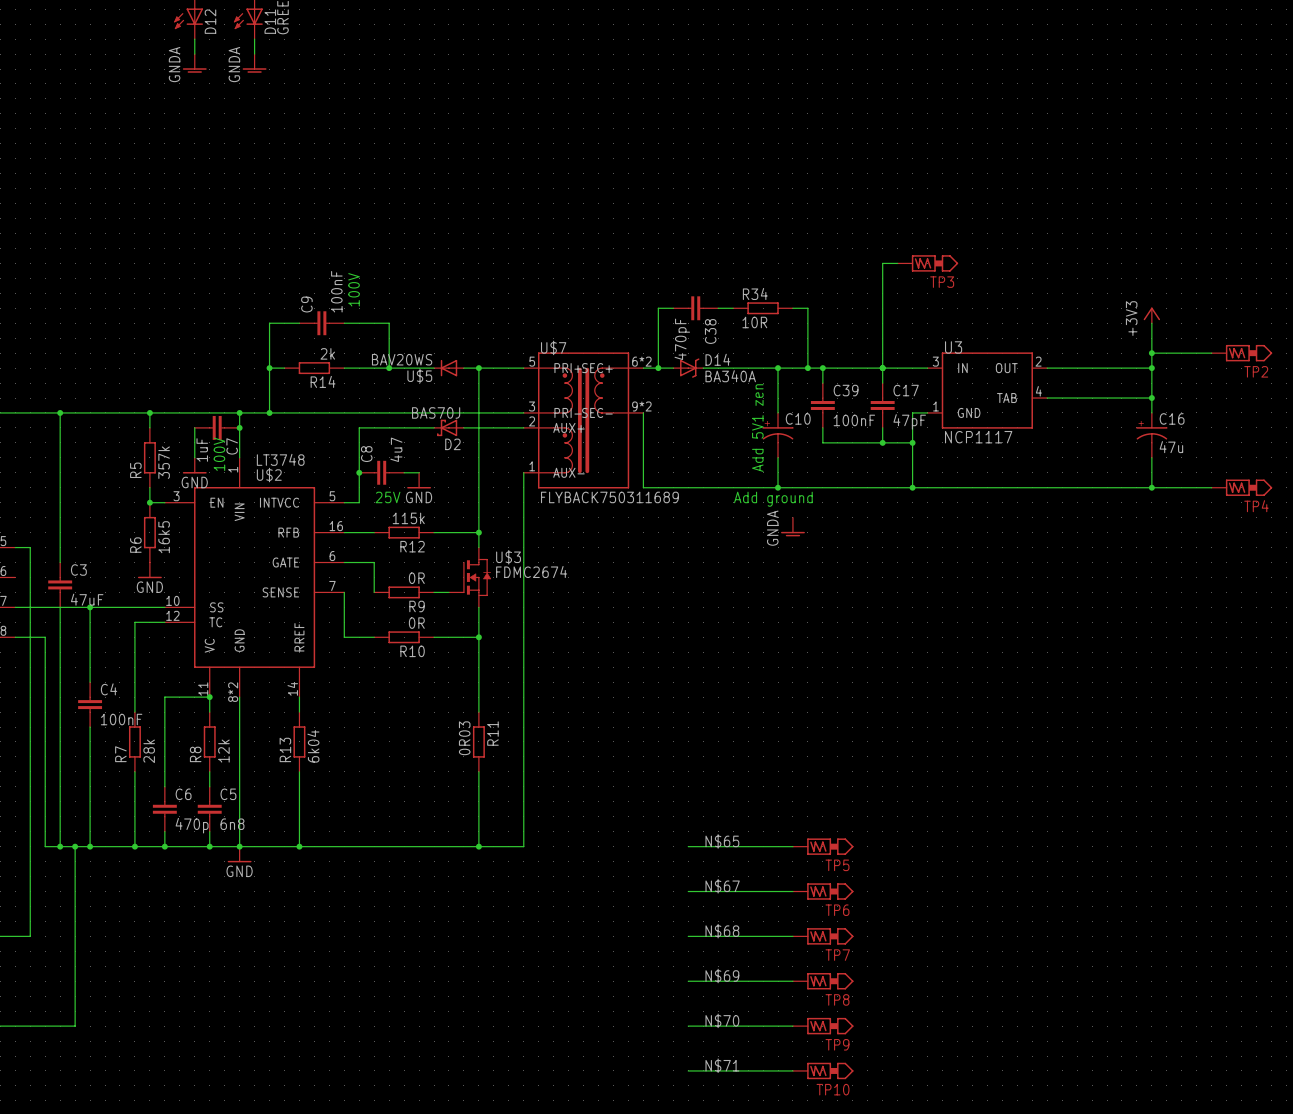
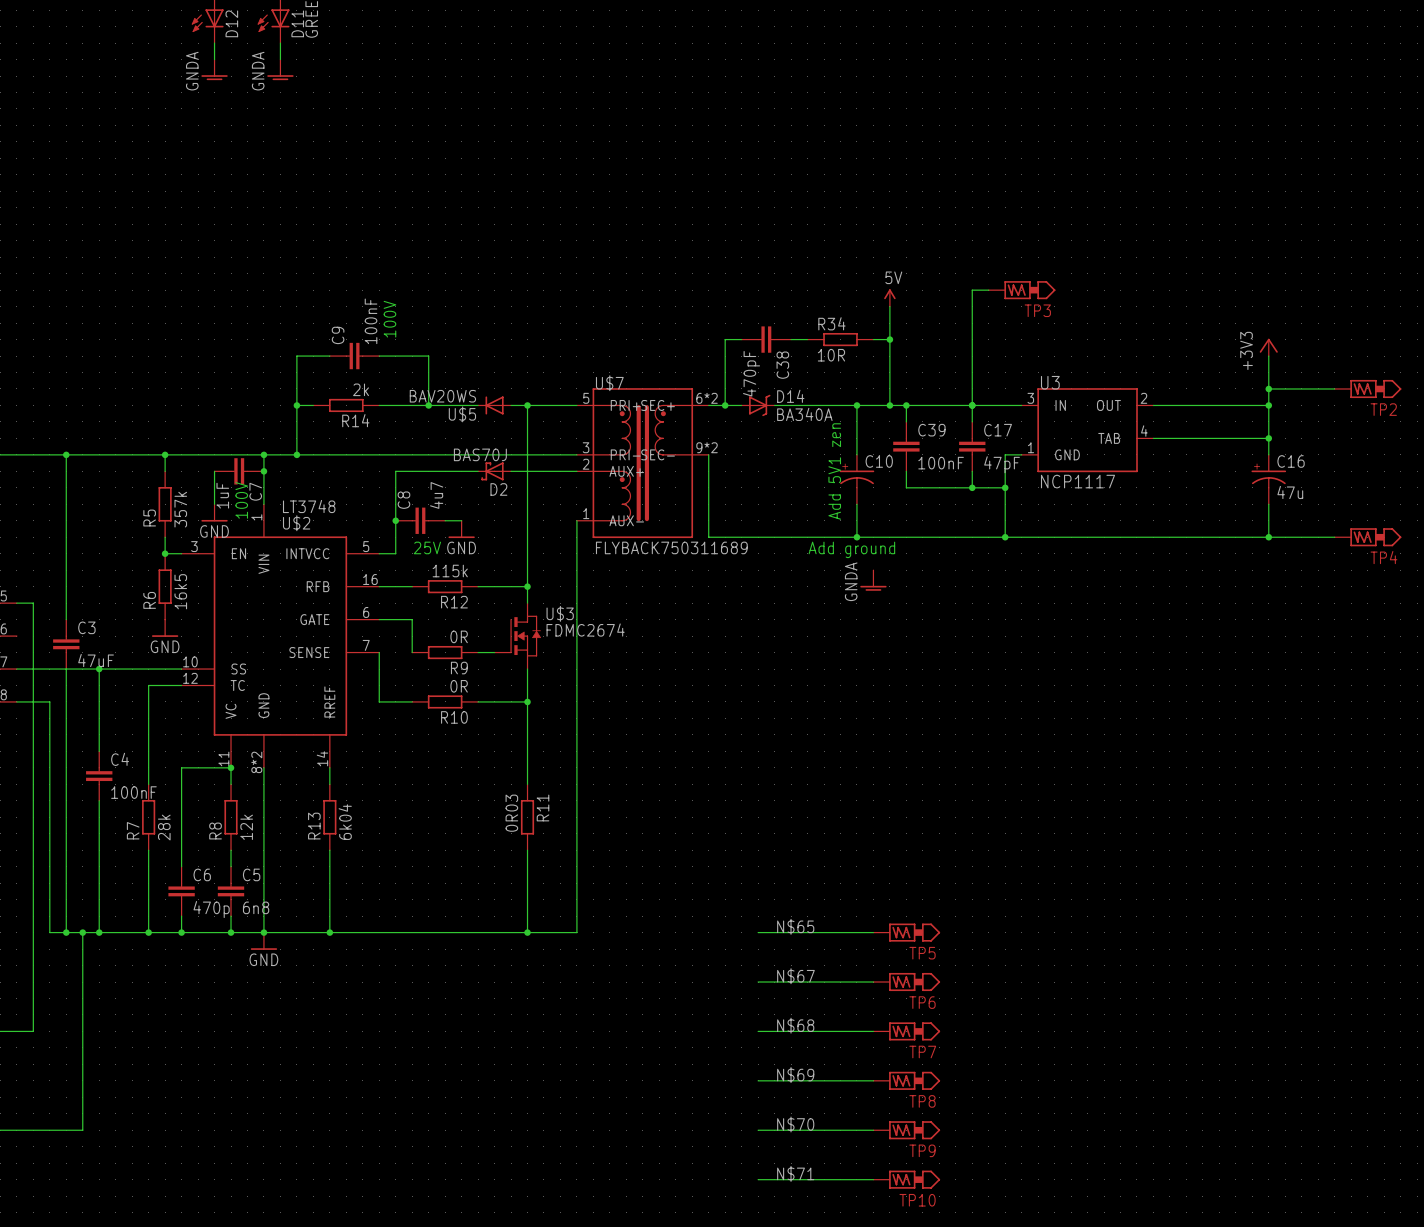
power symbol: none -> 5V (889, 297)
wire: none -> (889, 306) (889, 339)
junction: none -> (889, 339)

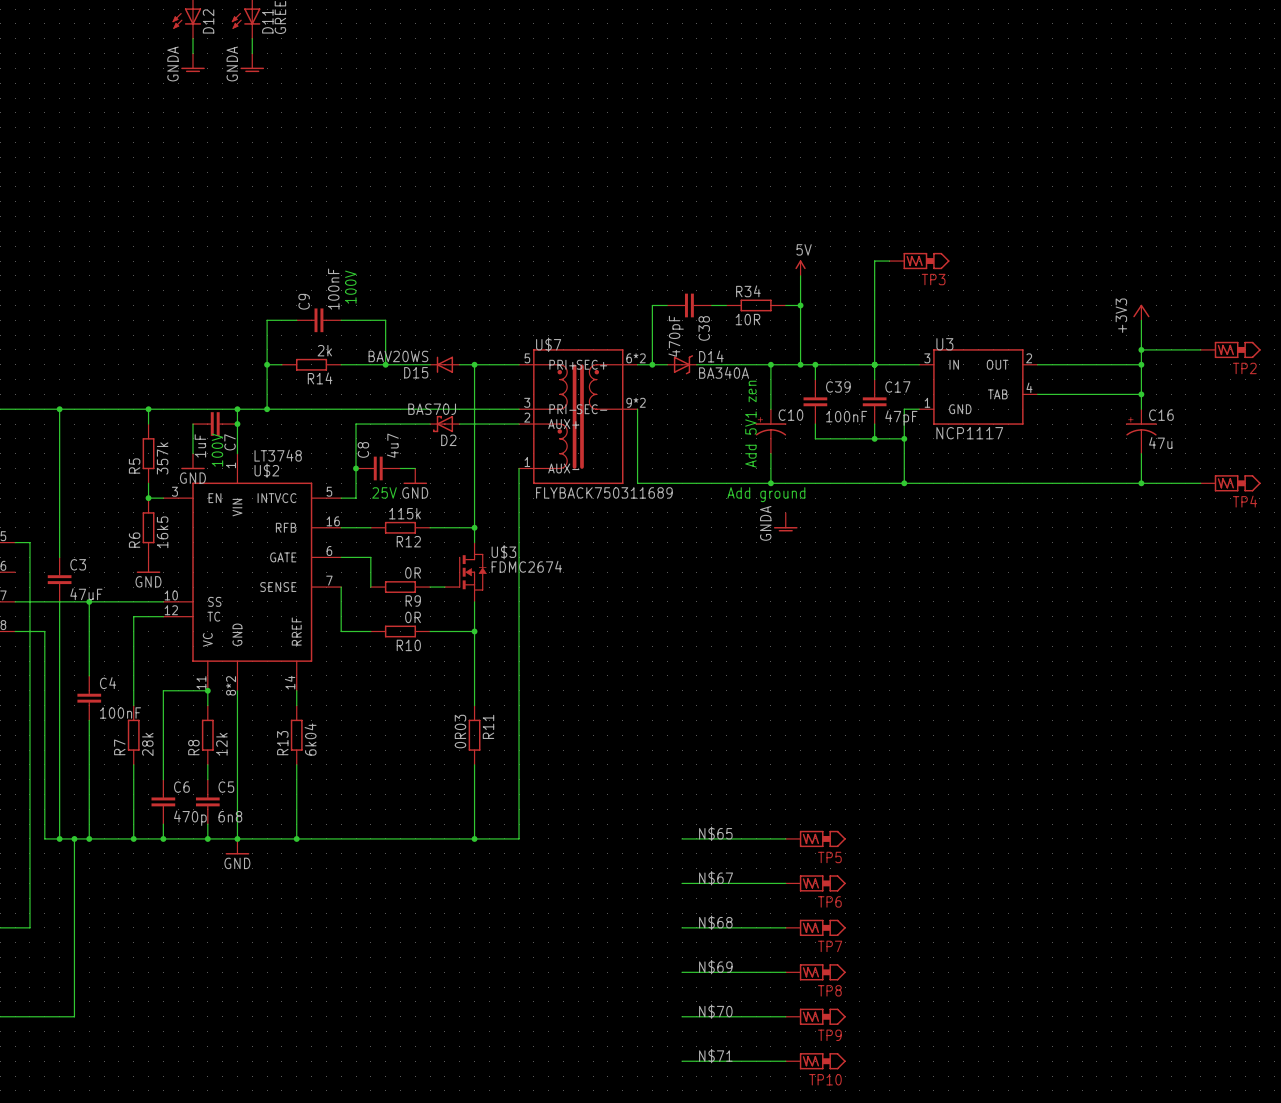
U$5 name: U$5 (462, 414) -> D15 (416, 372)

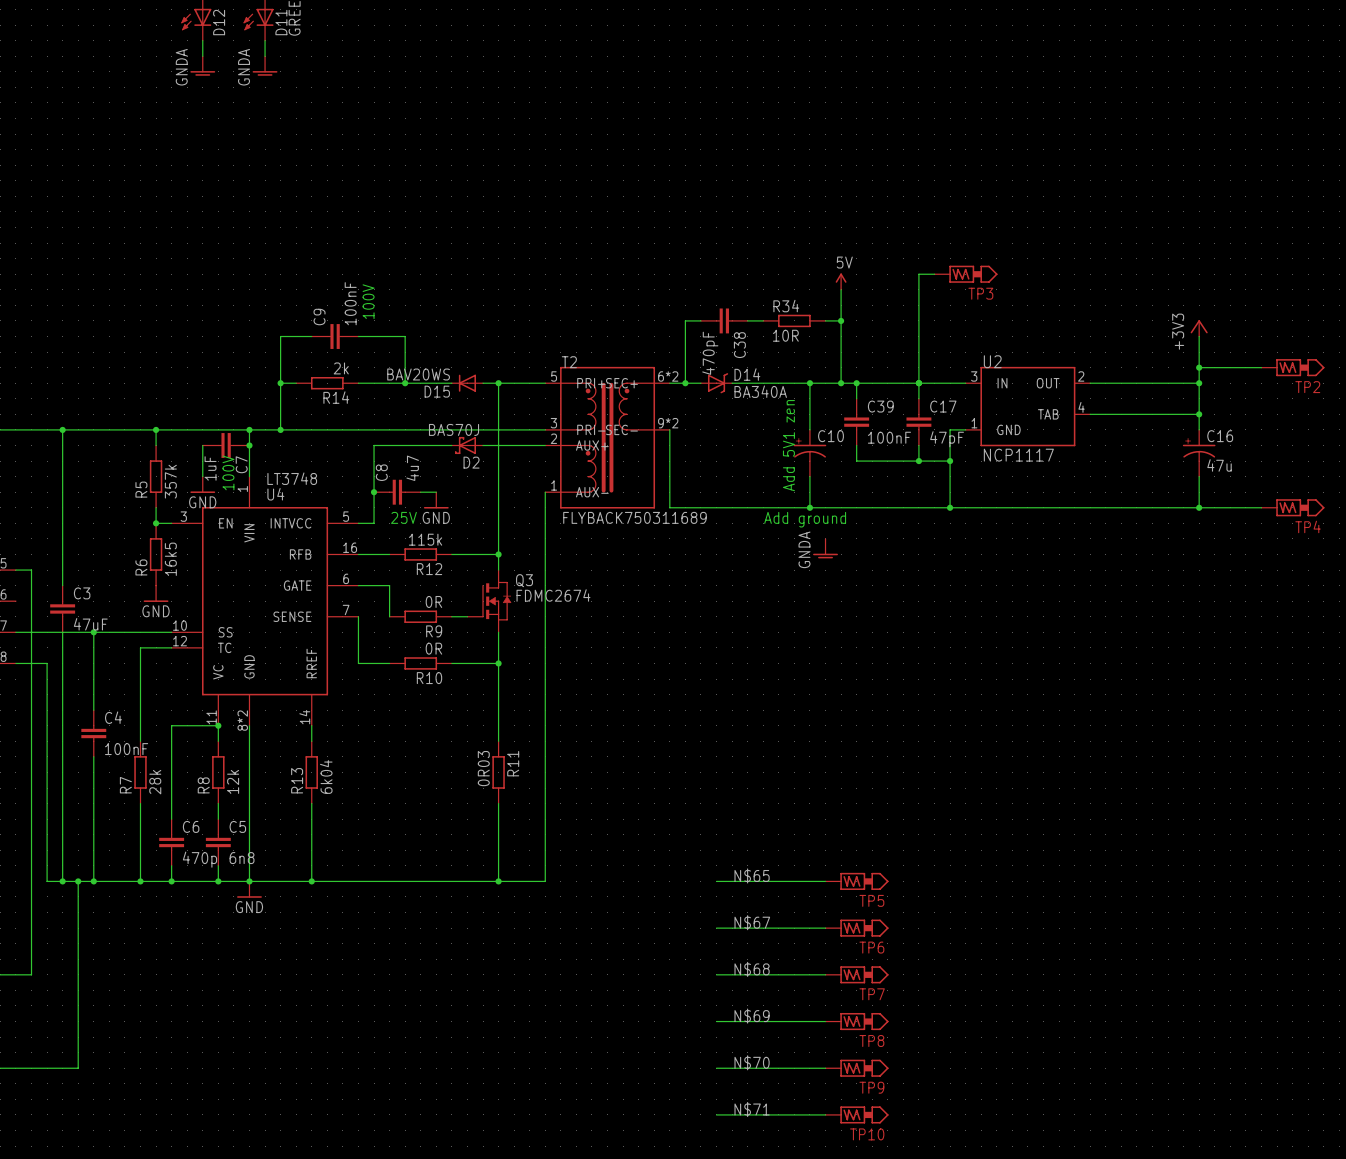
U$7 name: U$7 (548, 344) -> T2 (569, 362)
U3 name: U3 (944, 344) -> U2 (992, 361)
U$2 name: U$2 (266, 470) -> U4 (275, 494)
U$3 name: U$3 (503, 552) -> Q3 (524, 580)

